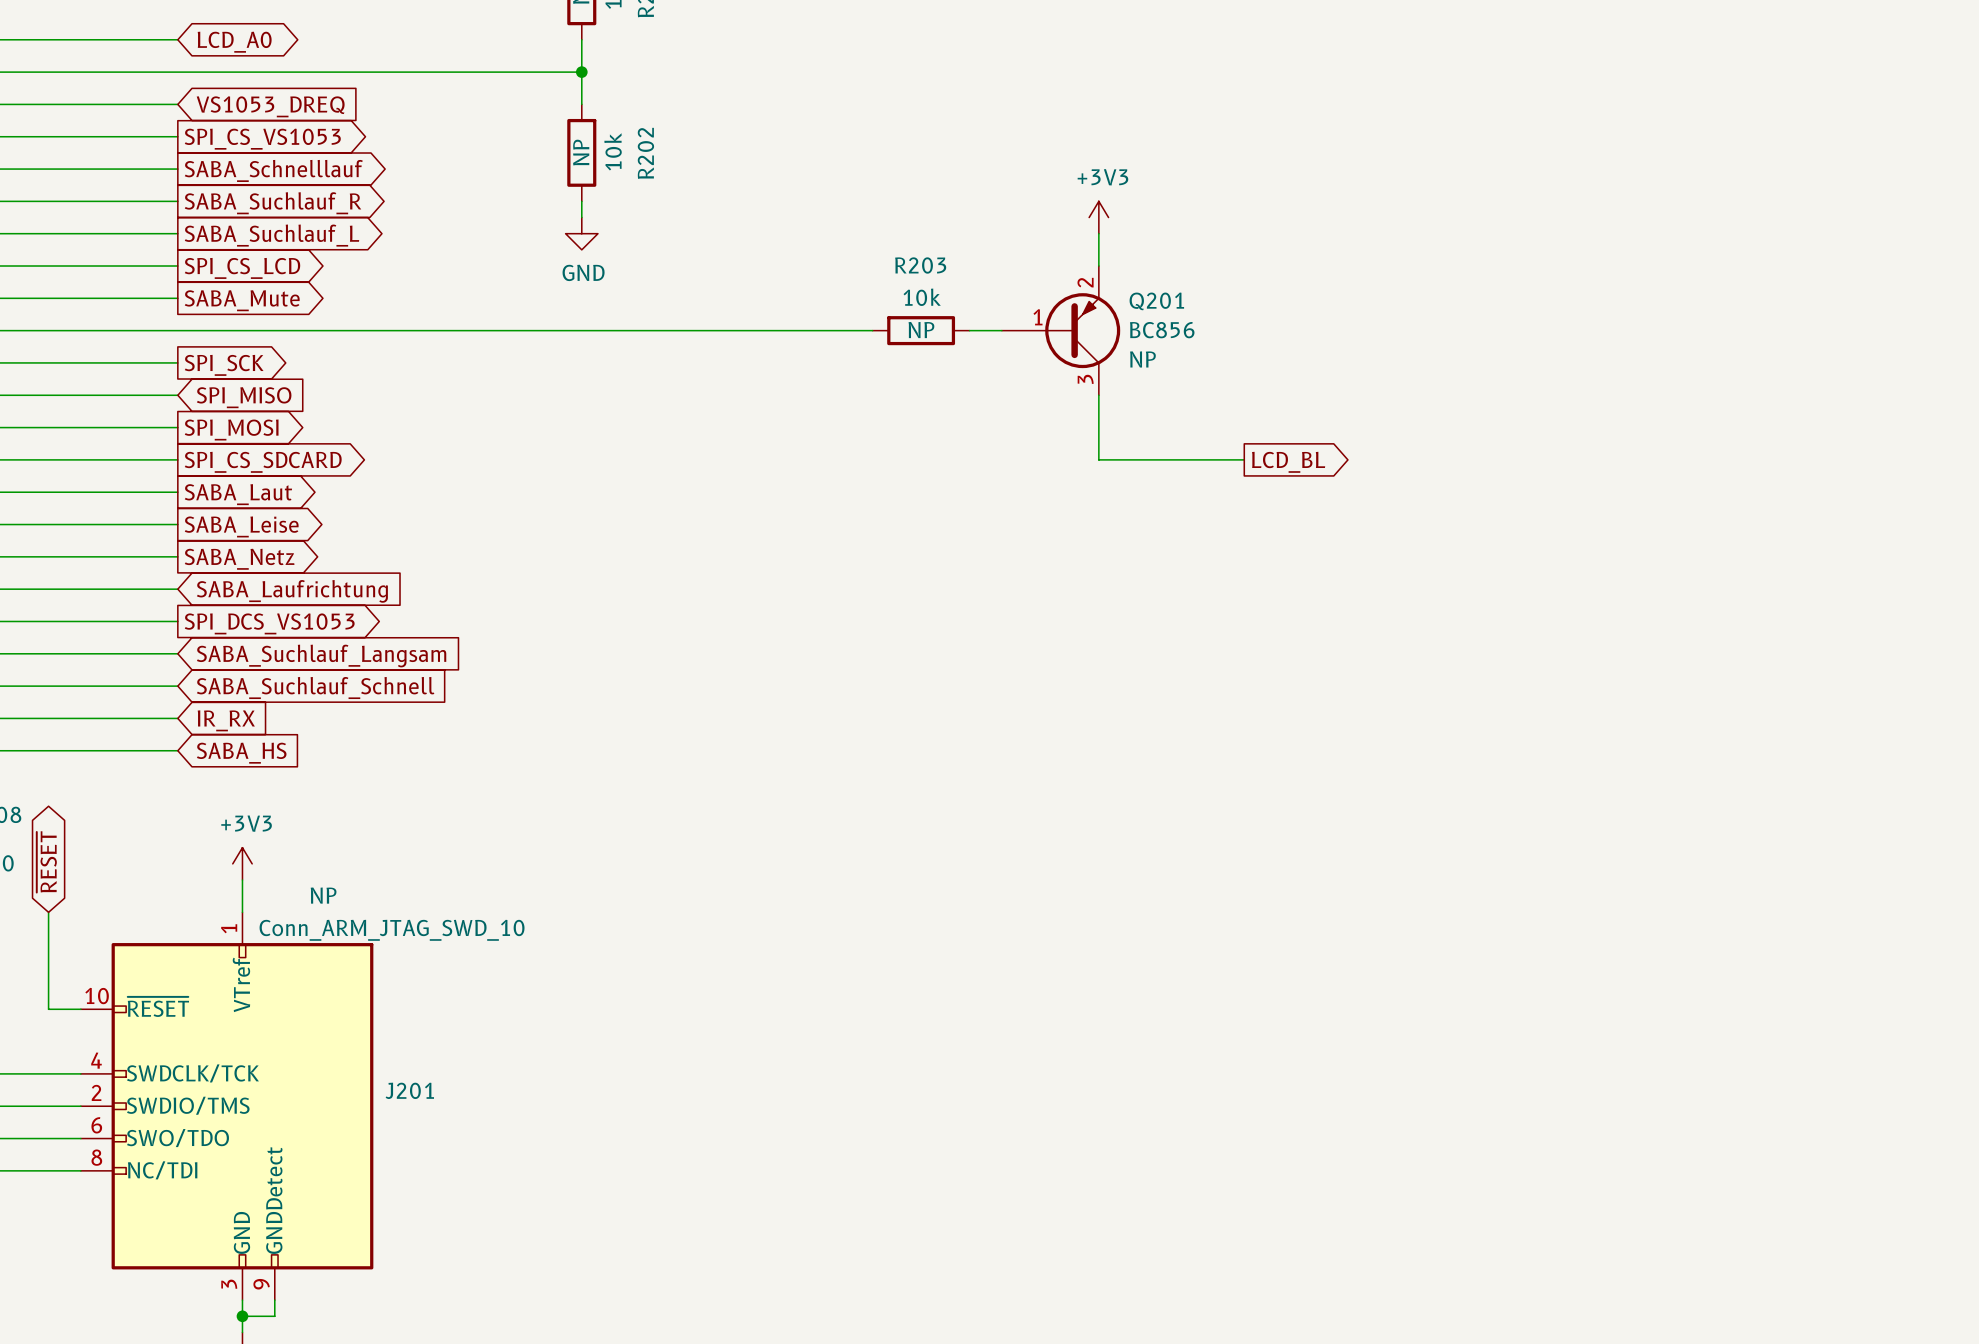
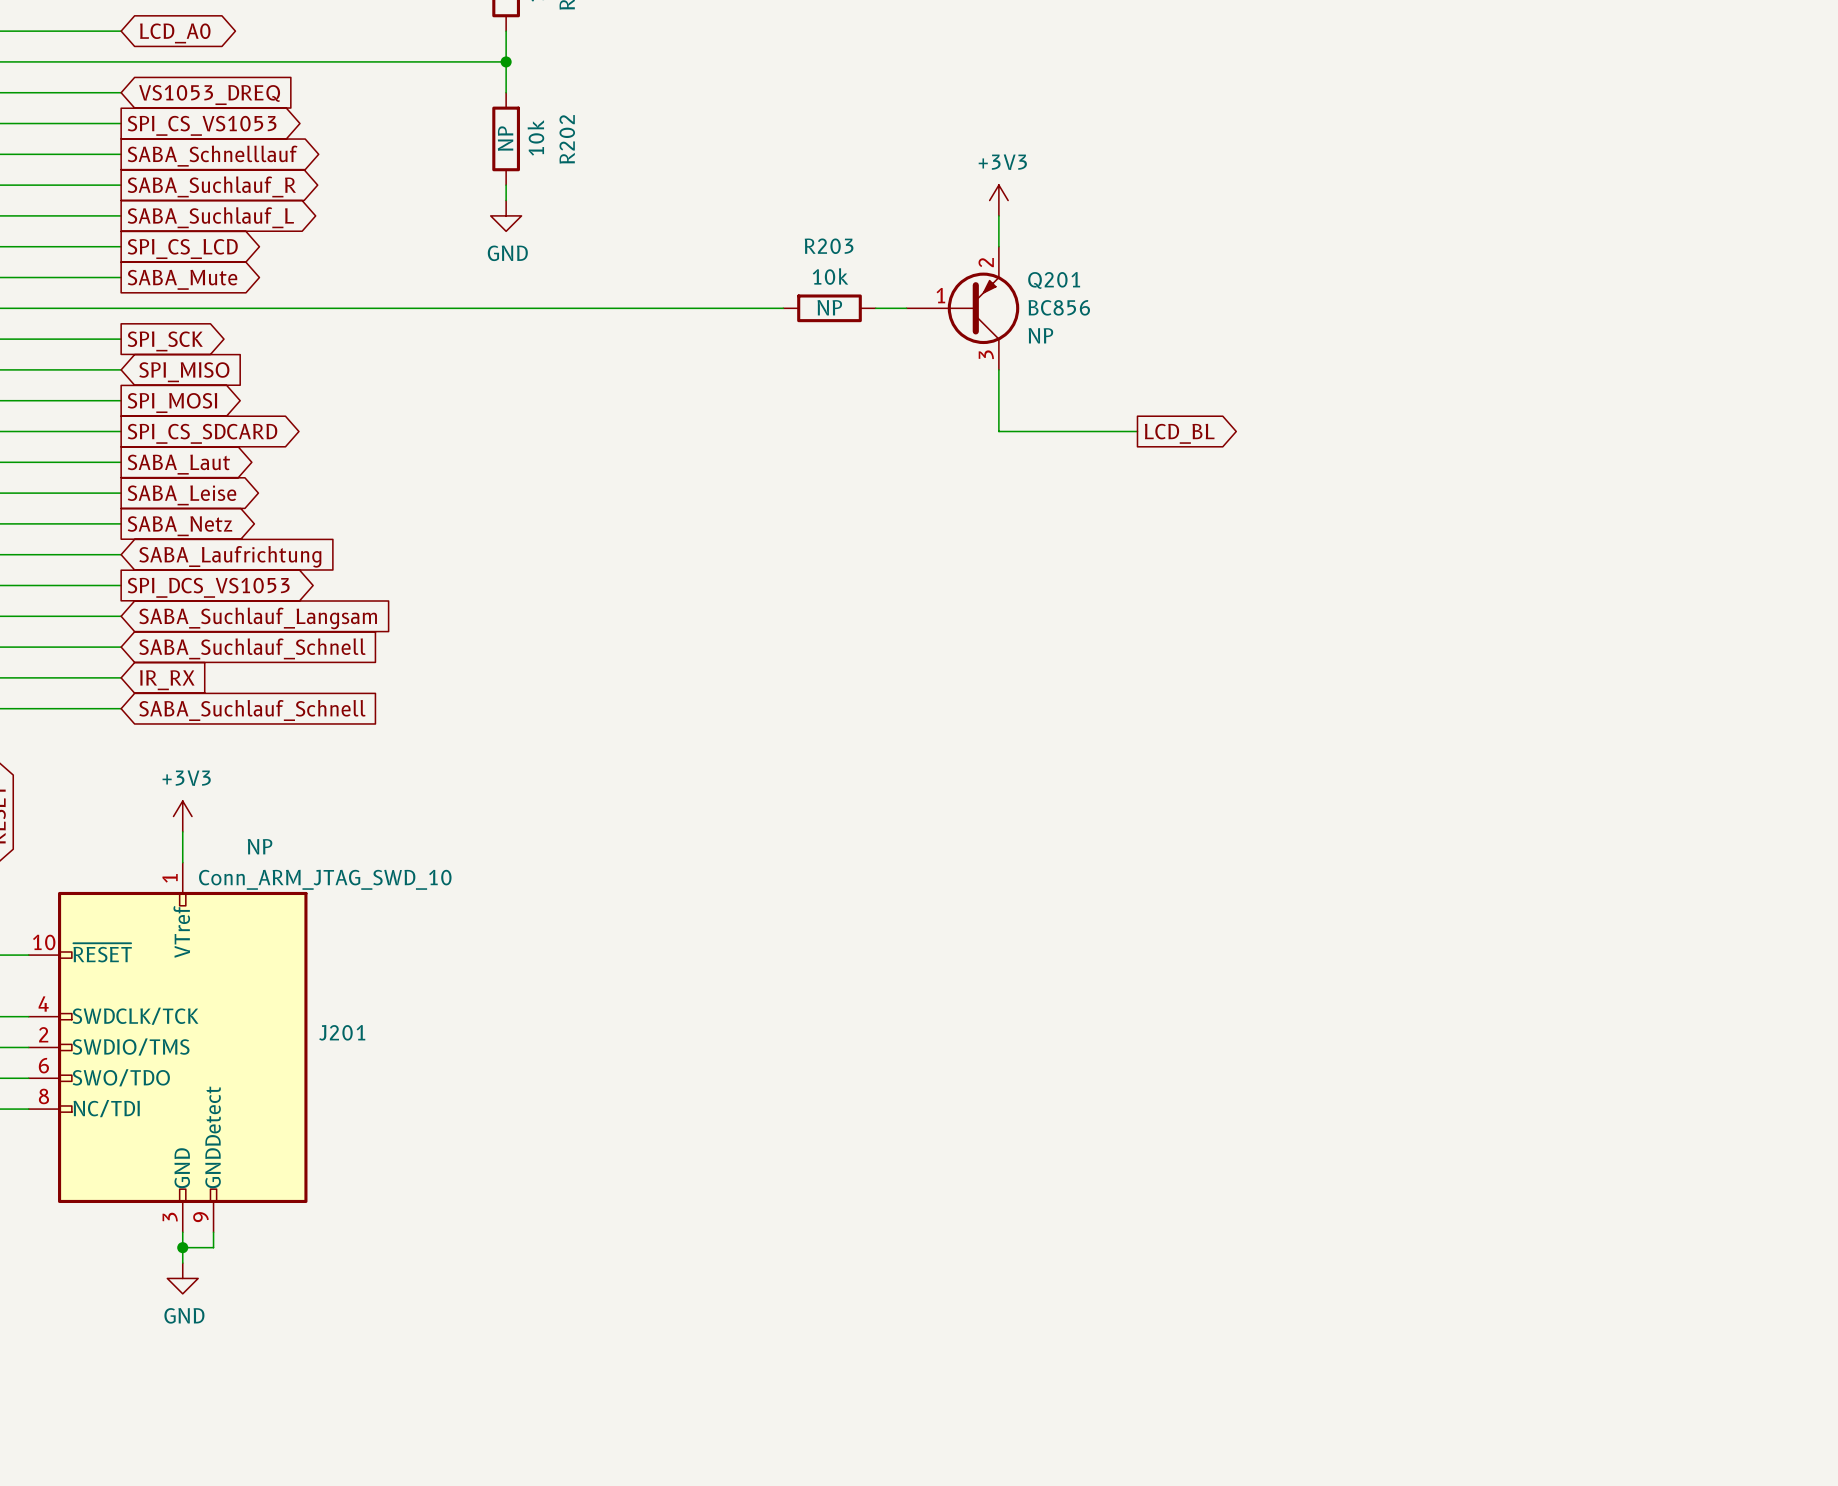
global label: SABA_HS (241, 753) -> SABA_Suchlauf_Schnell (252, 710)

